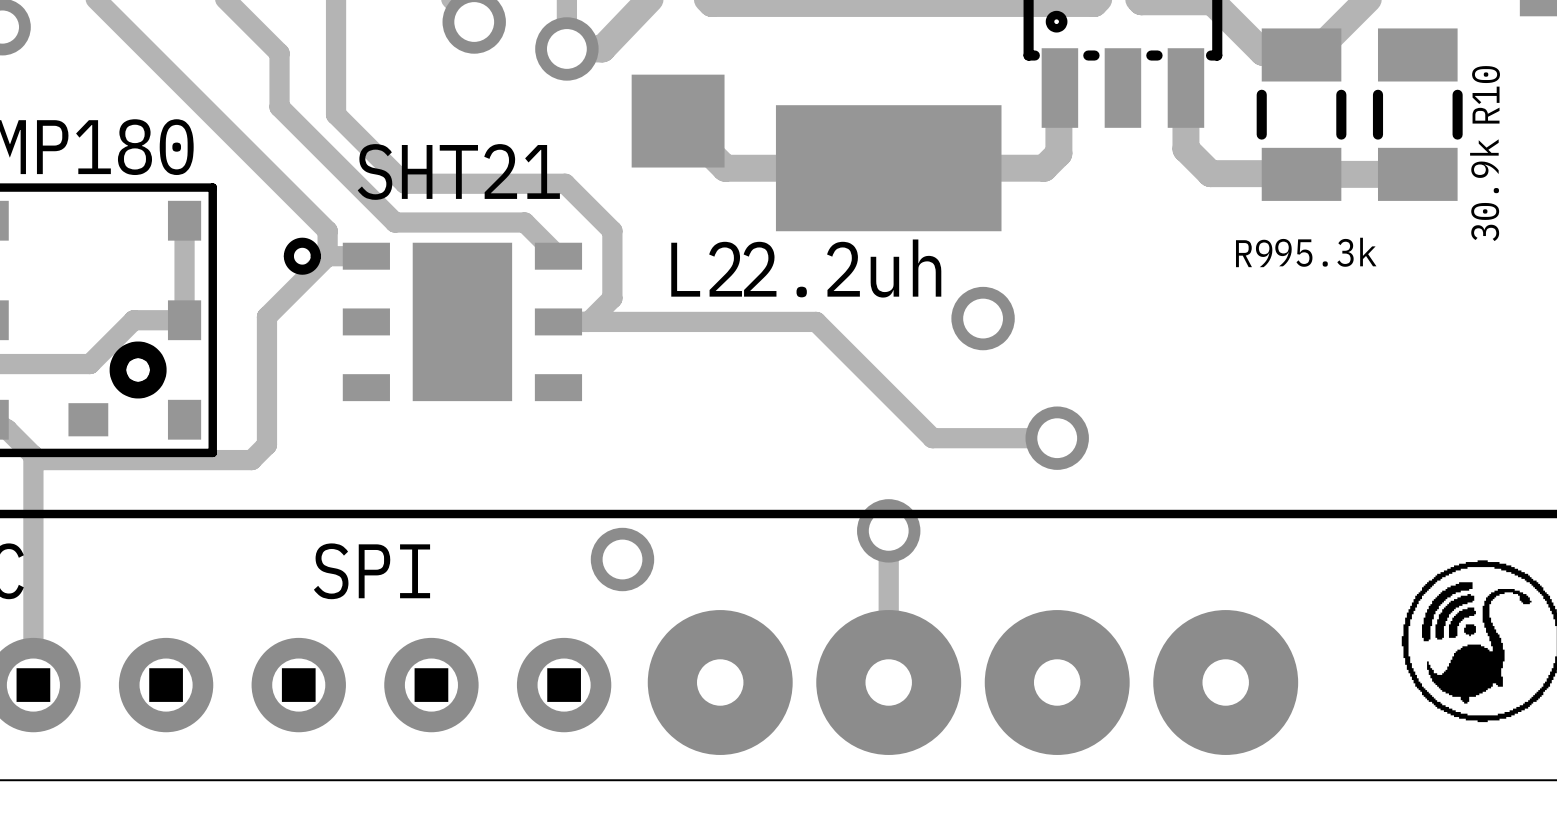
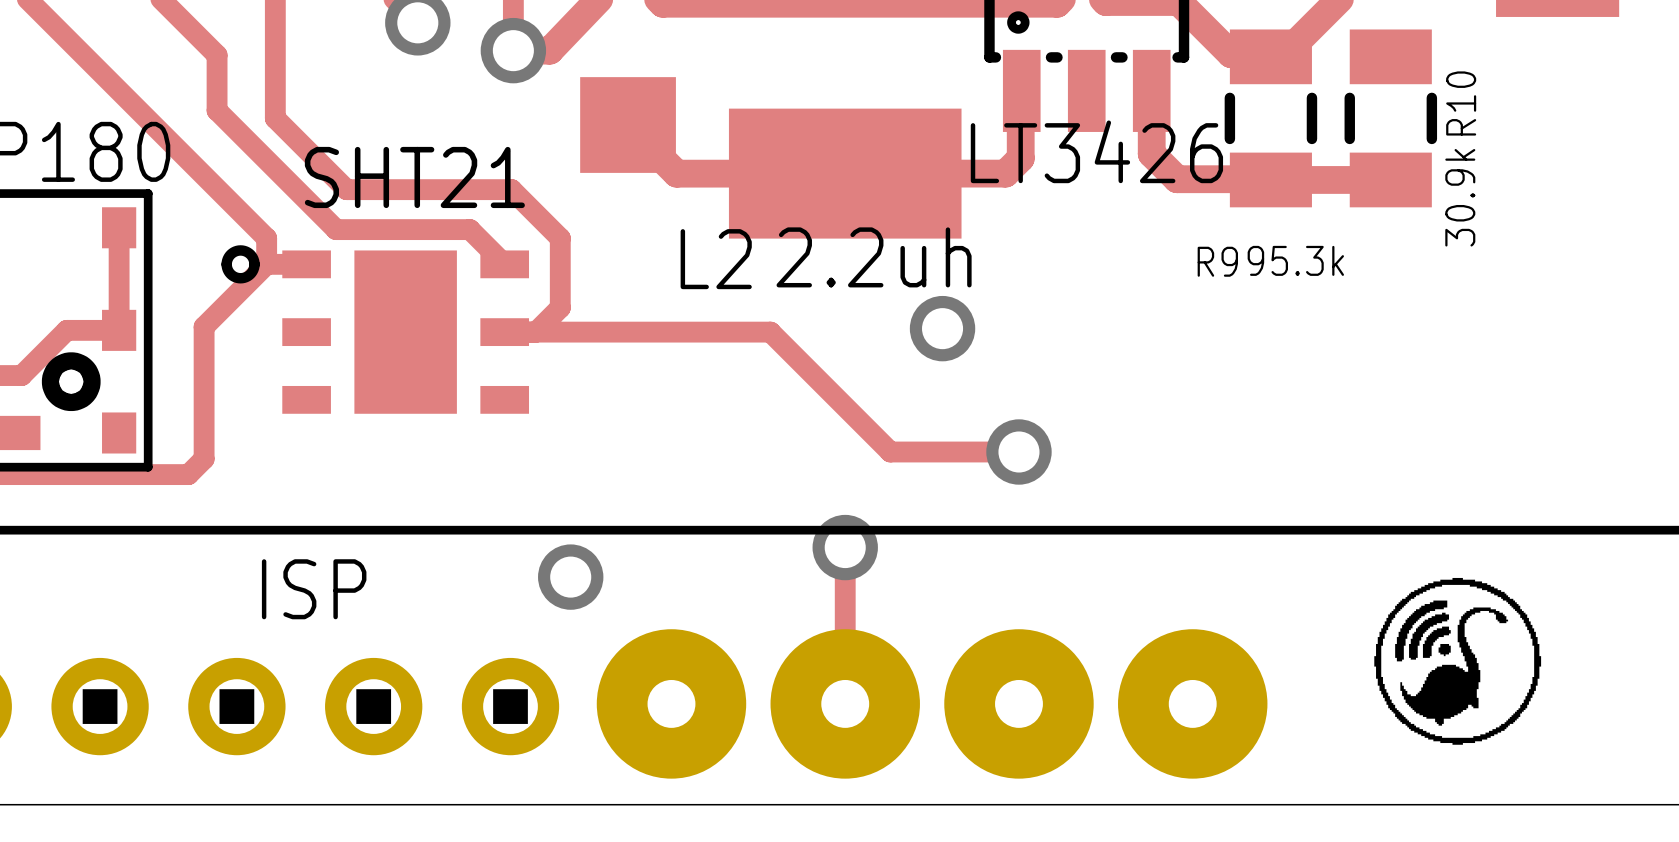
LT3426 name: none -> LT3426 (1096, 151)
L2 value position: 2.2uh (842, 268) -> 2.2uh (874, 257)
L2 name position: L2 (706, 269) -> L2 (716, 259)
text: SPI (371, 571) -> ISP (314, 589)

